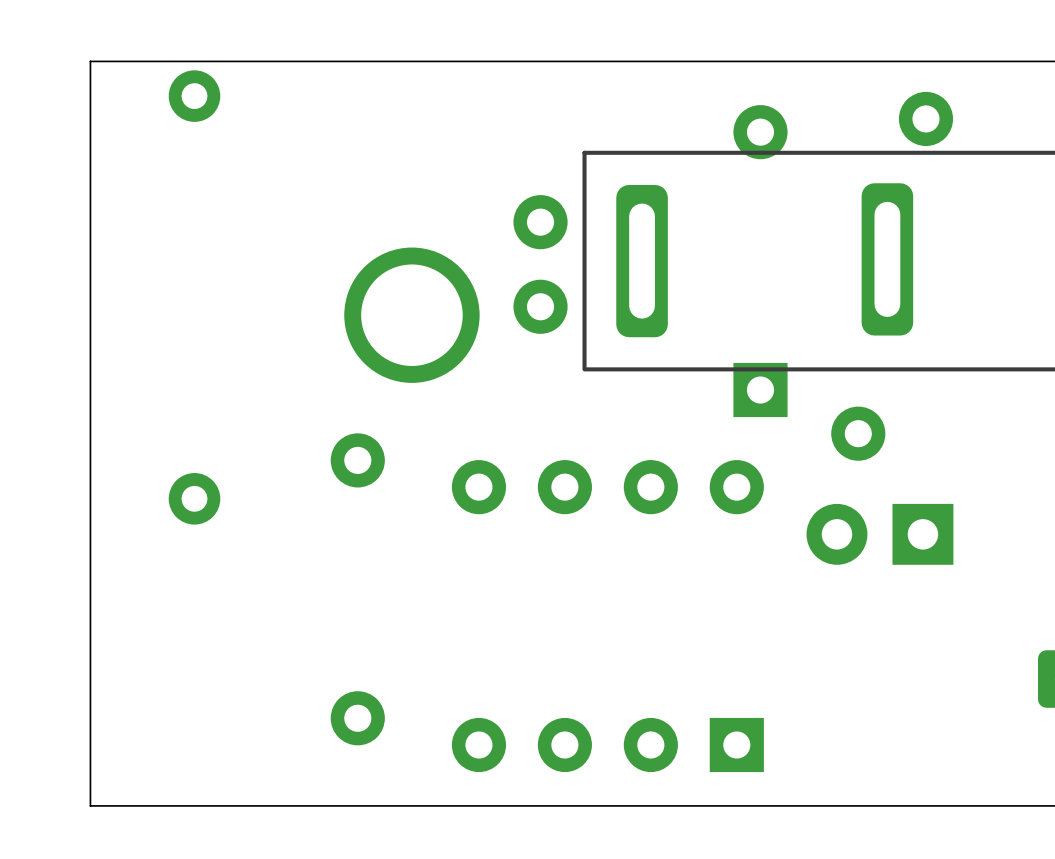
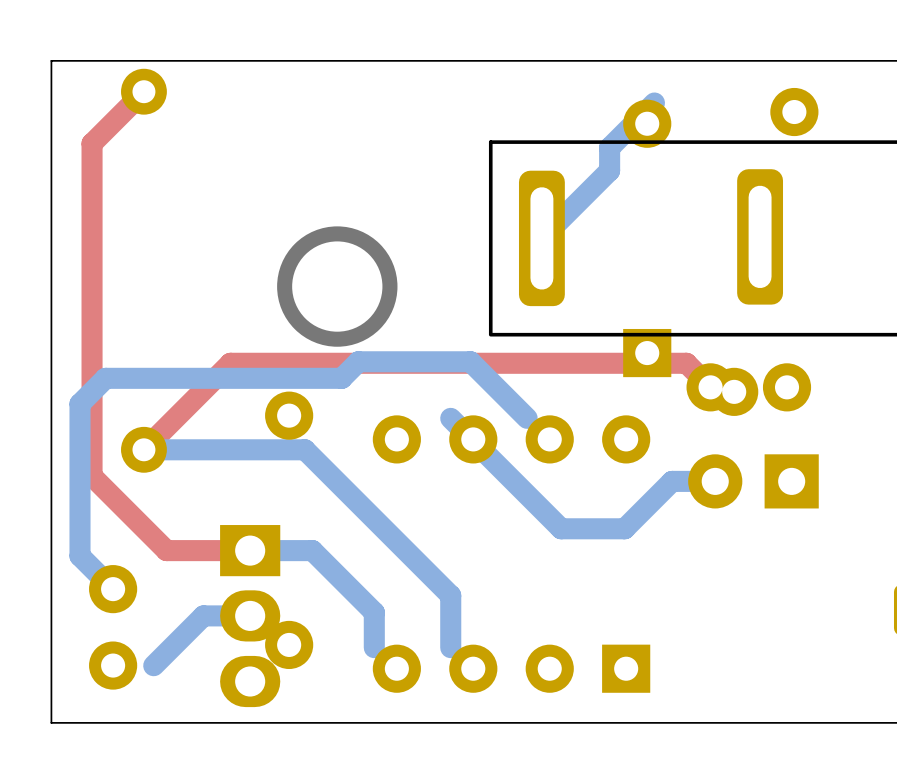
top track: none -> (143, 91) (92, 143) (92, 476) (166, 550) (250, 550)
bottom track: none -> (654, 102) (609, 147) (609, 170) (541, 238)
part rotation: 0° (540, 264) -> 90° clockwise (748, 387)
part position: (540, 264) -> (748, 387)
top track: none -> (710, 387) (686, 363) (230, 363) (143, 449)
bottom track: none -> (450, 418) (561, 528) (624, 528) (672, 481) (715, 481)
bottom track: none -> (527, 418) (470, 361) (358, 361) (341, 378) (105, 378) (80, 403) (80, 556) (113, 589)
bottom track: none -> (143, 449) (304, 449) (450, 595) (450, 647)
bottom track: none -> (244, 550) (312, 550) (374, 612) (374, 647)
bottom track: none -> (250, 615) (203, 615) (153, 665)
part: none -> (250, 616)
part: none -> (113, 627)

